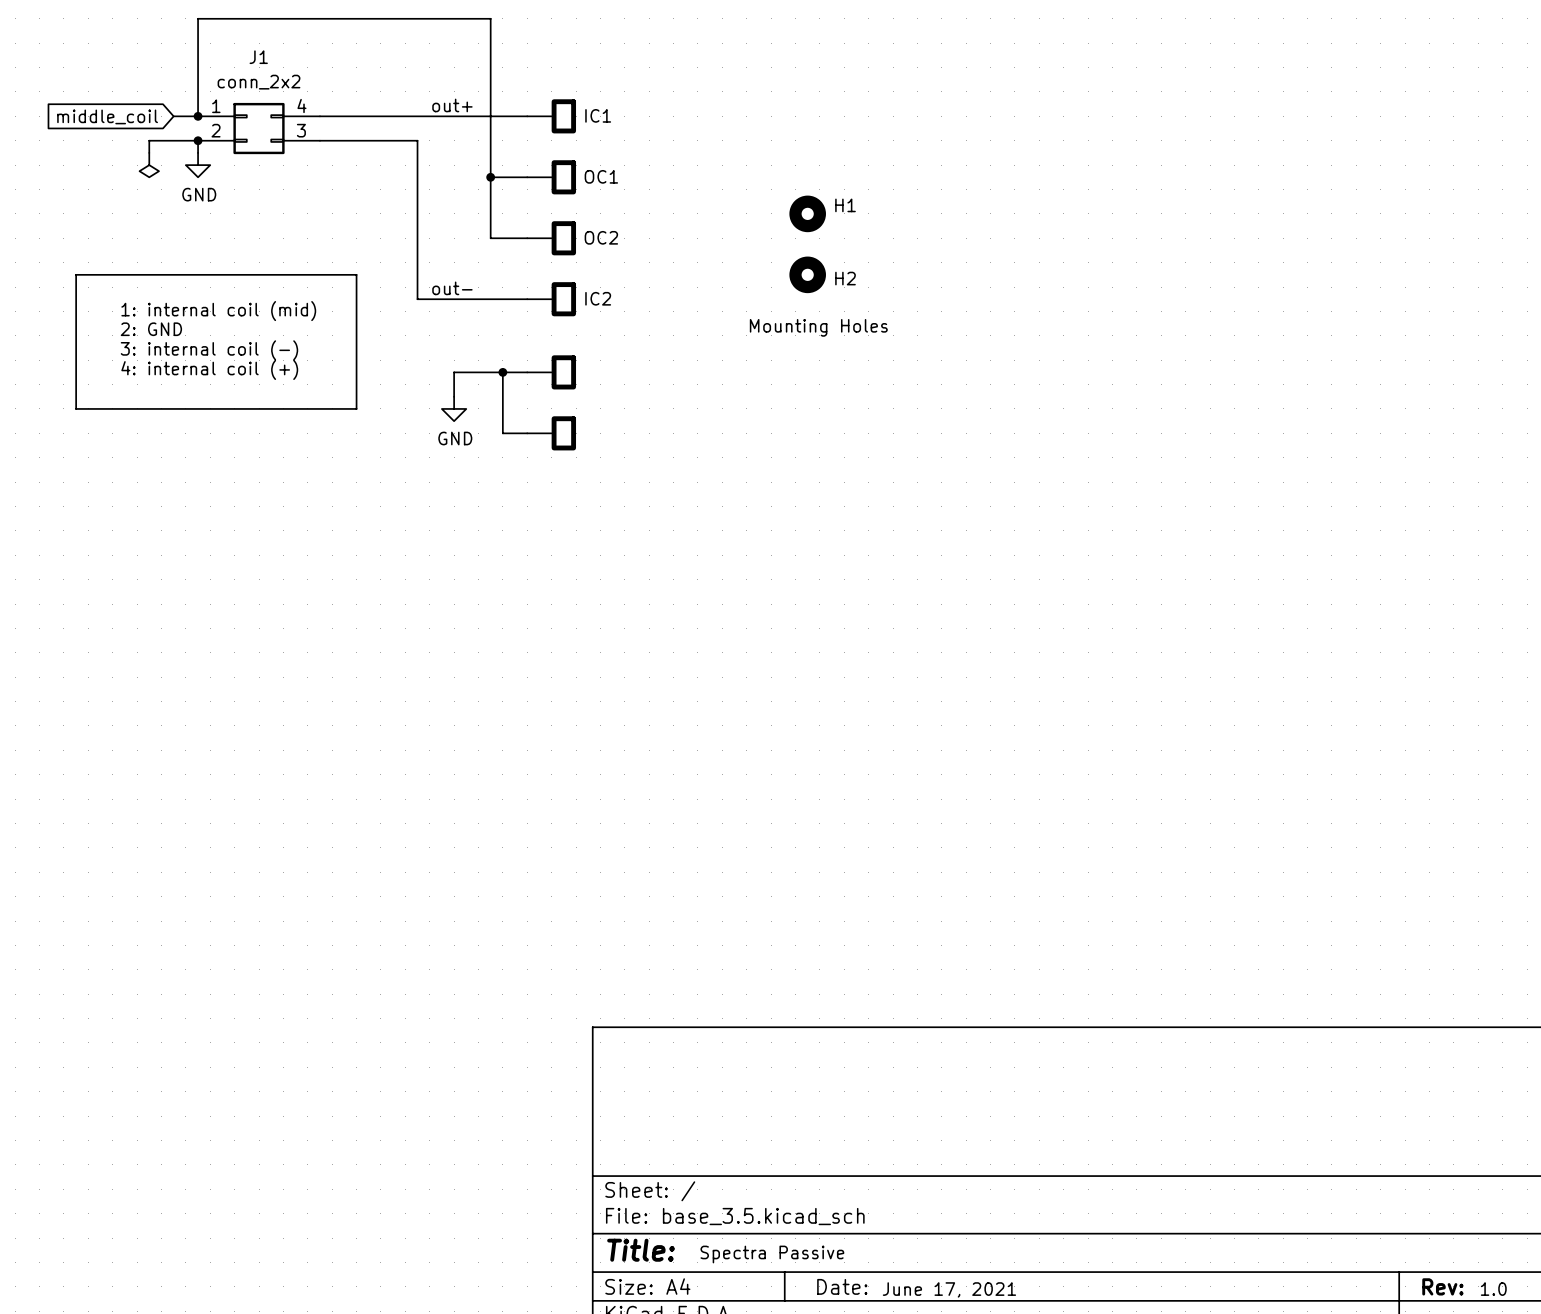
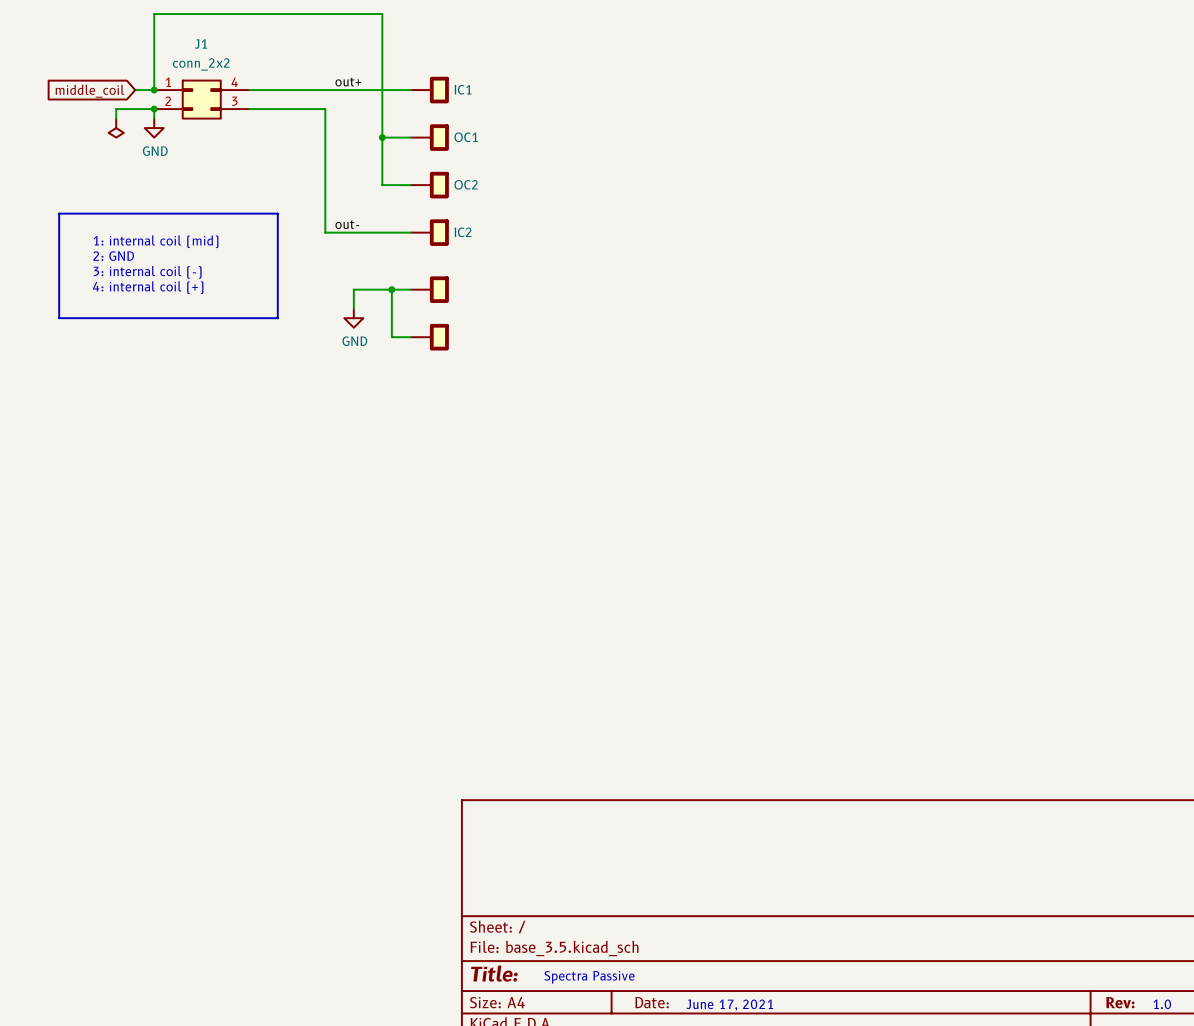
H1: (807, 213) -> none
H2: (807, 274) -> none
text: Mounting Holes (818, 327) -> none

